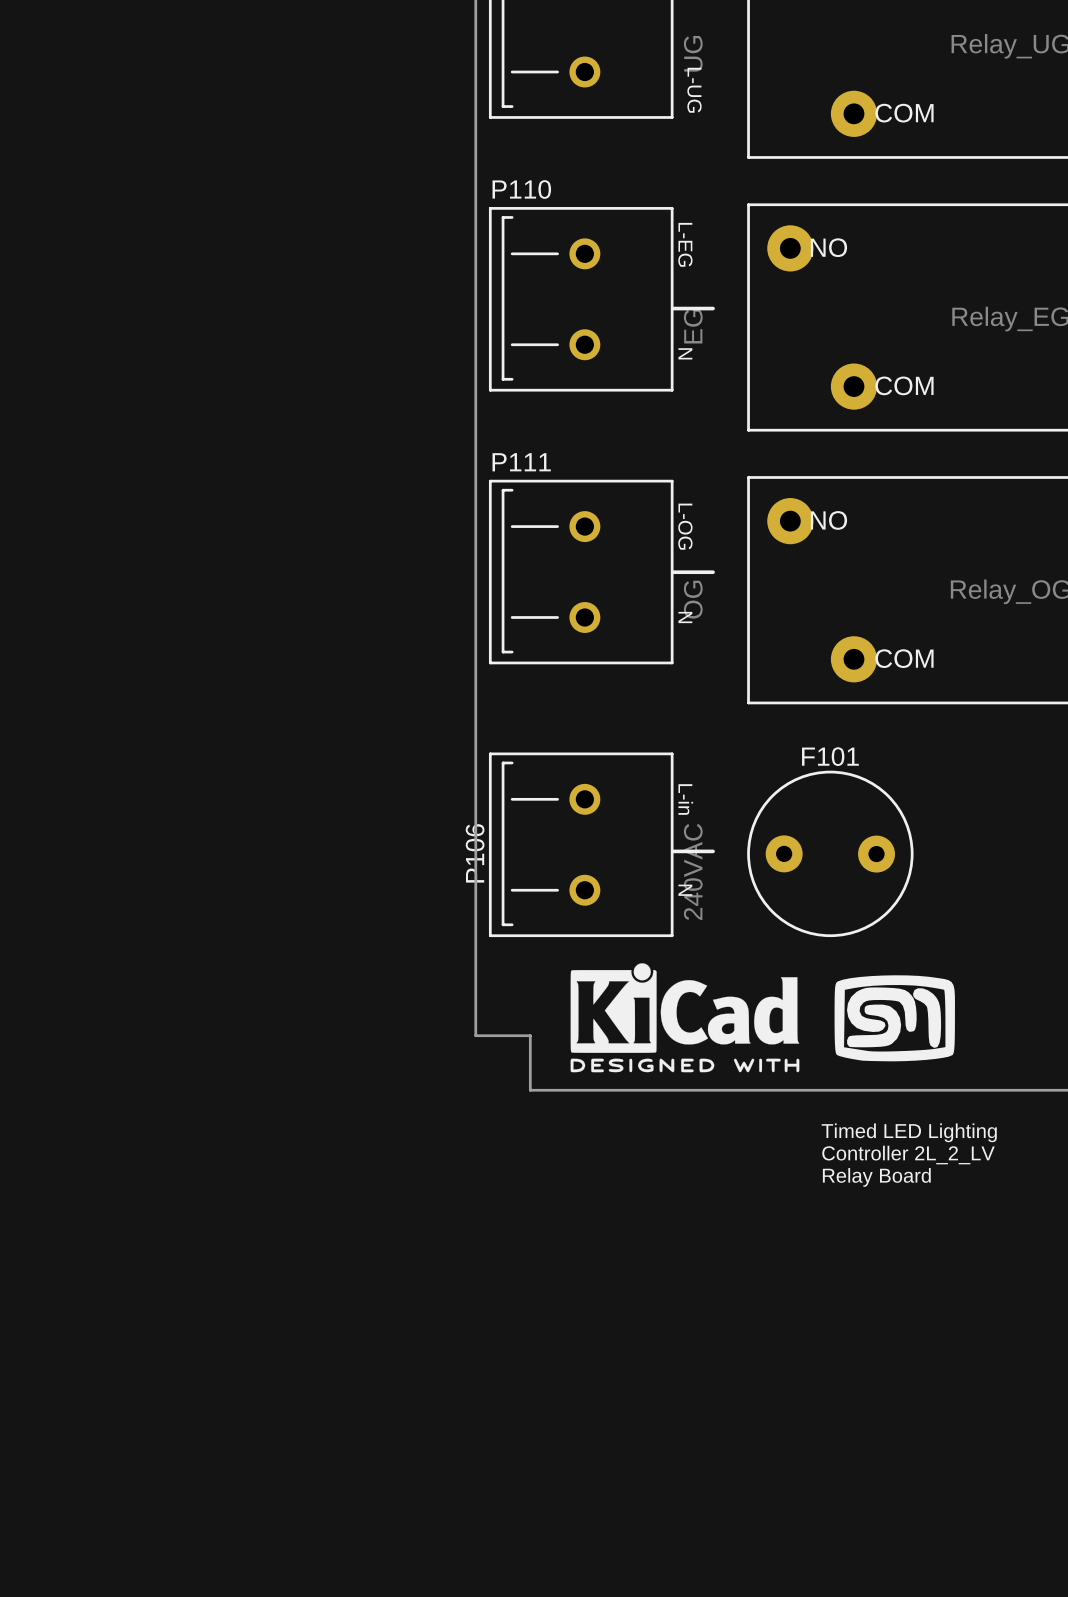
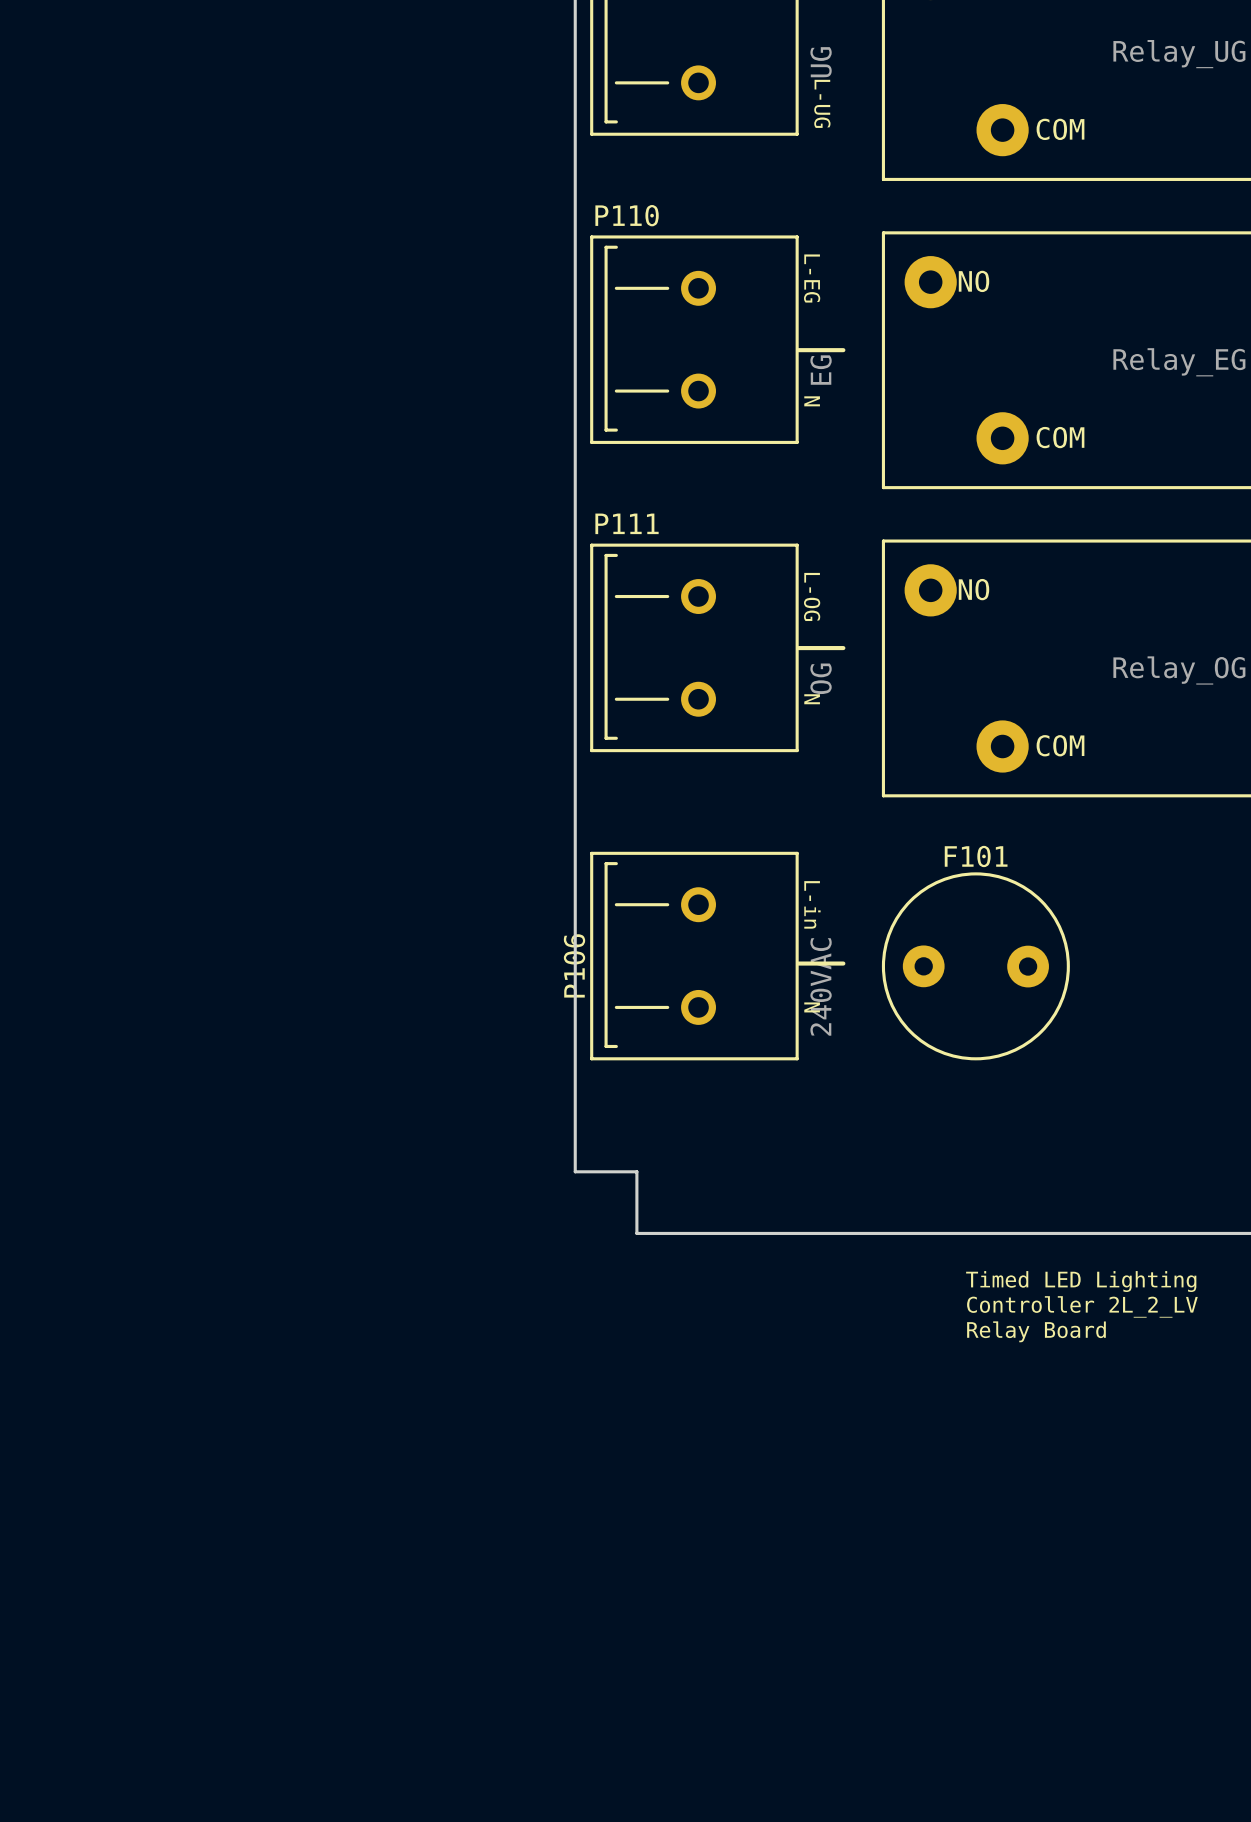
drawing: [570, 963, 800, 1073] -> none
drawing: [834, 975, 955, 1062] -> none

